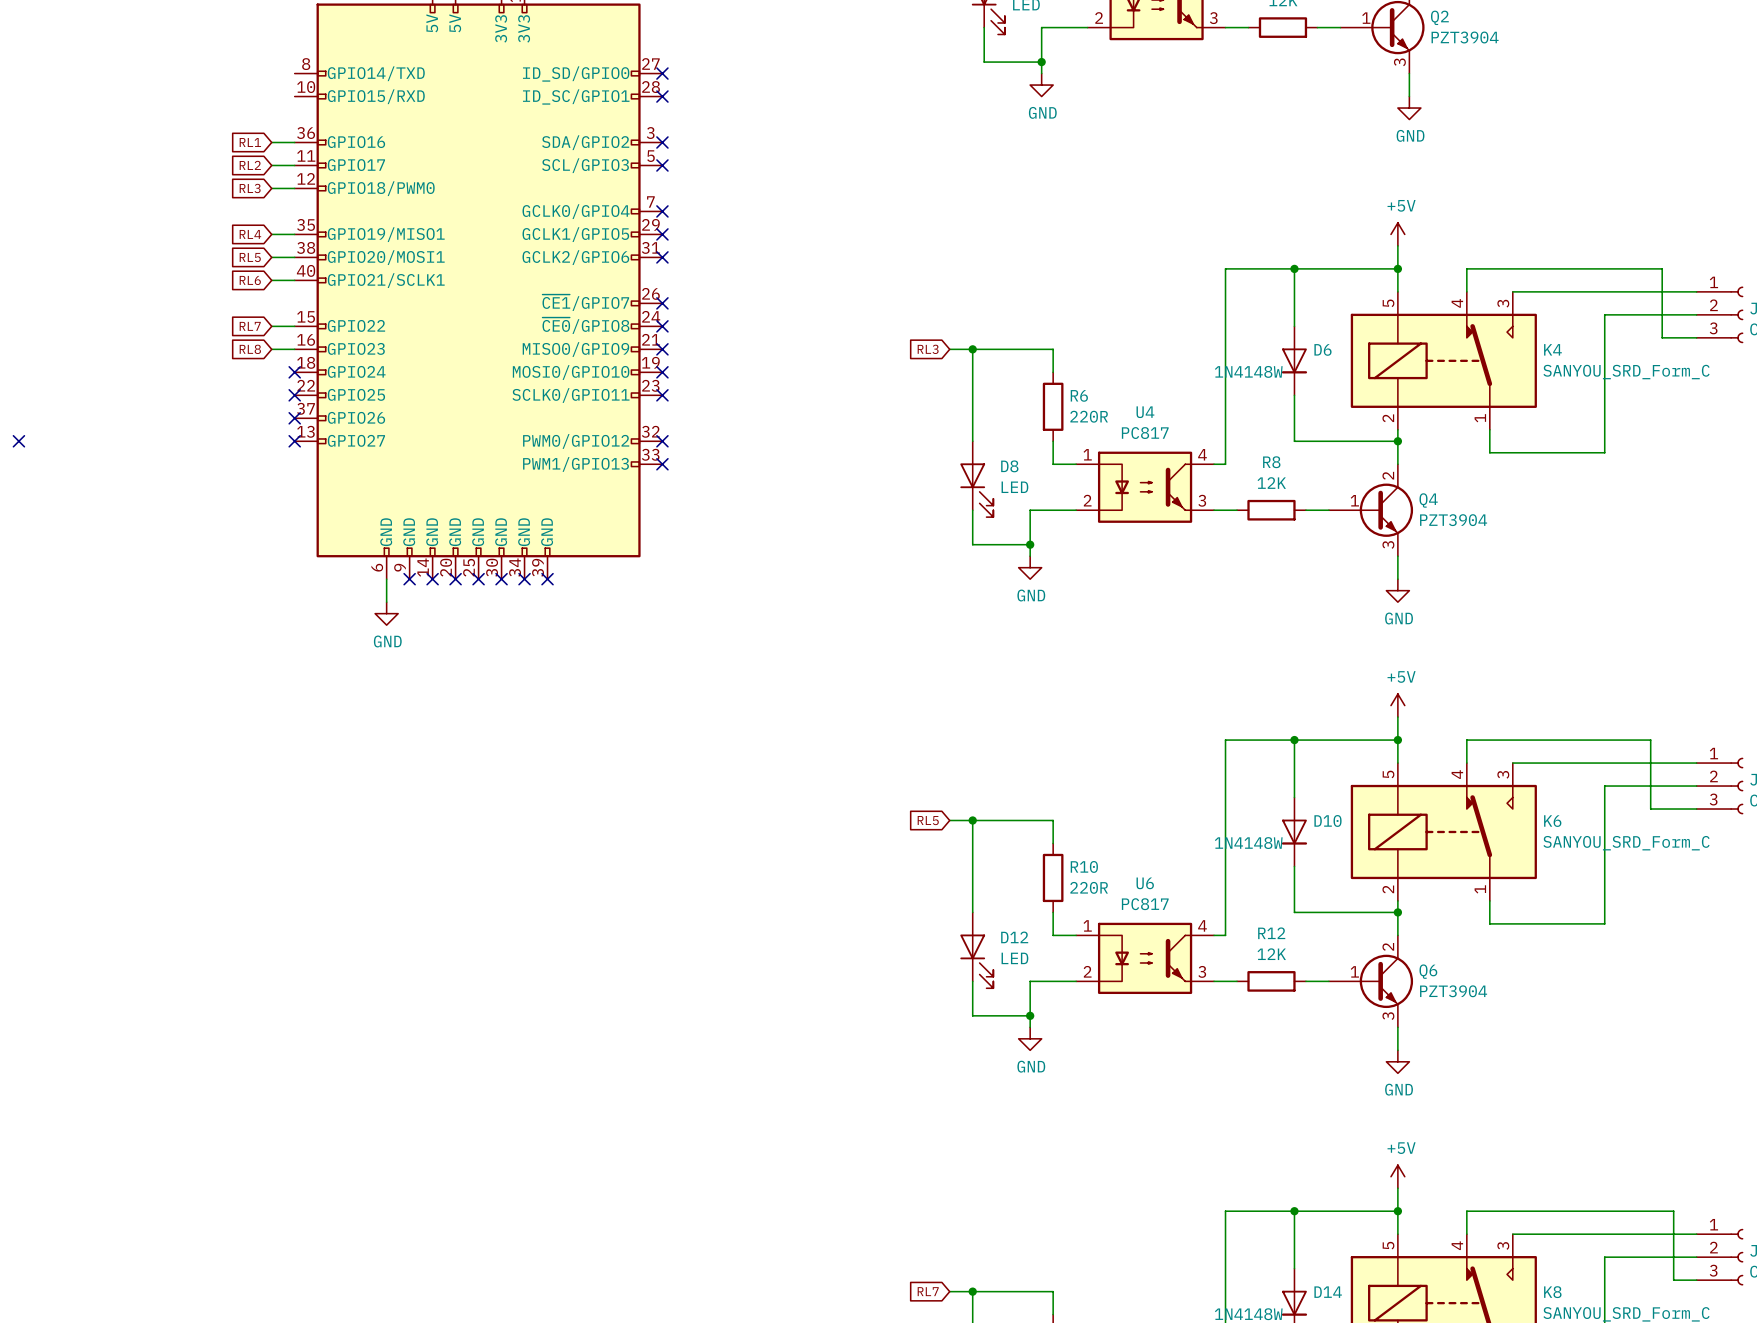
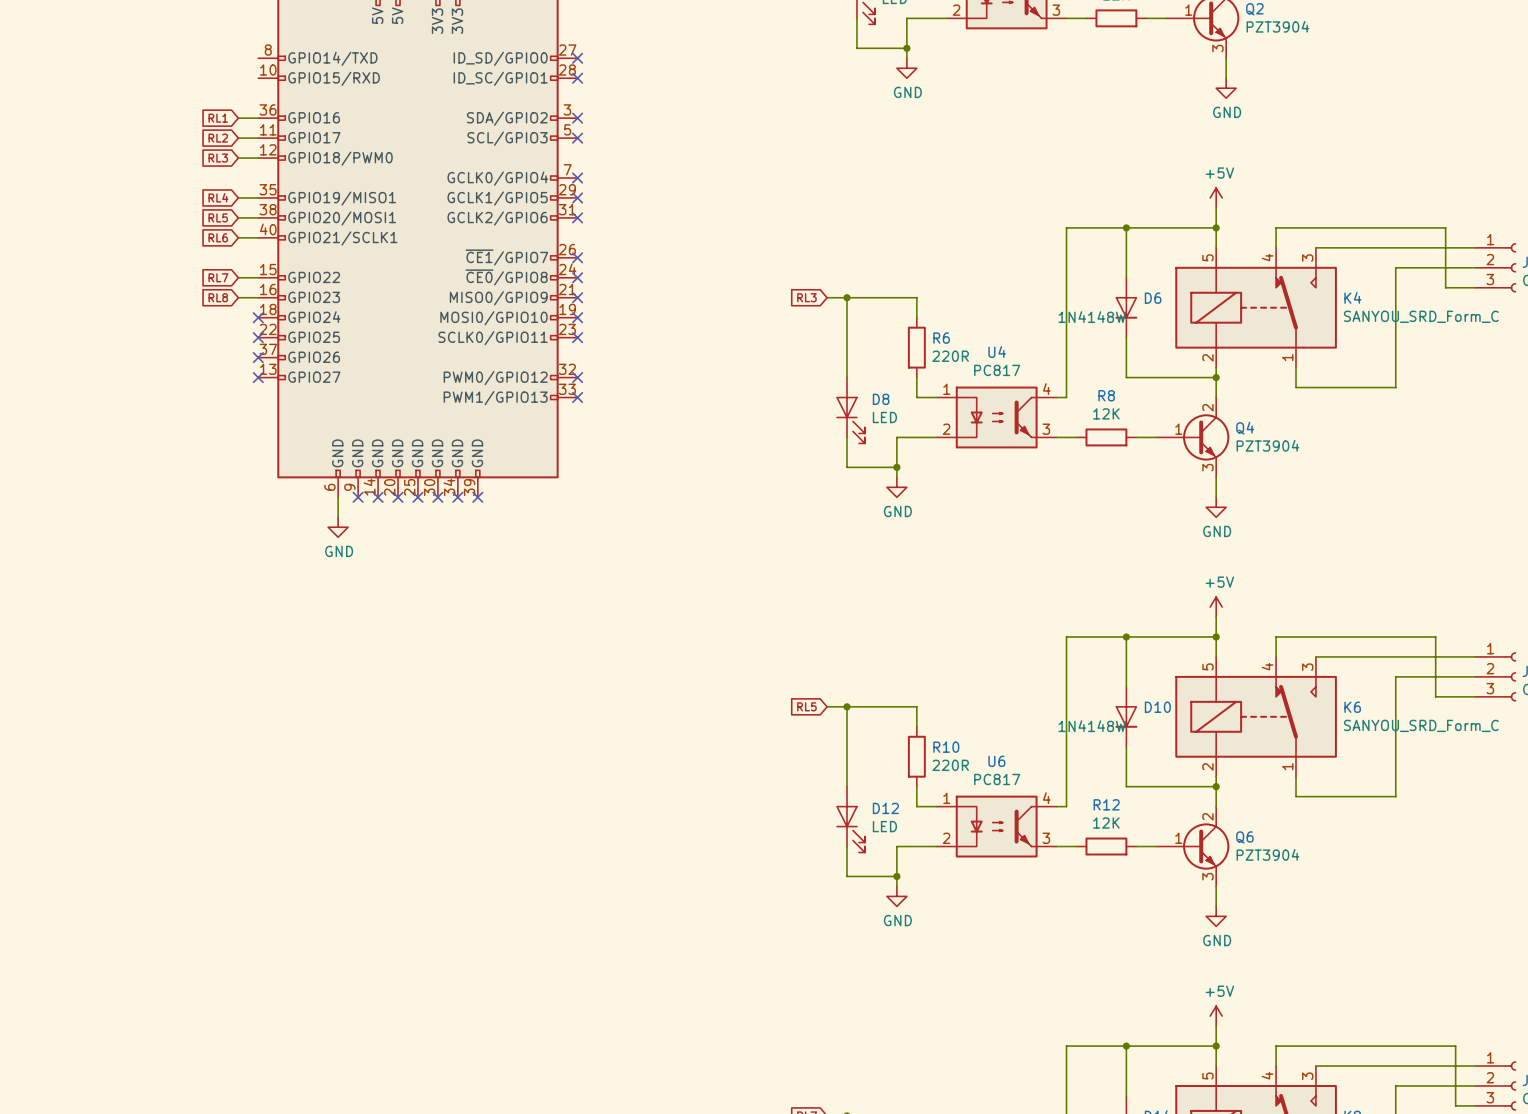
no-connect mark: (18, 441) -> none

